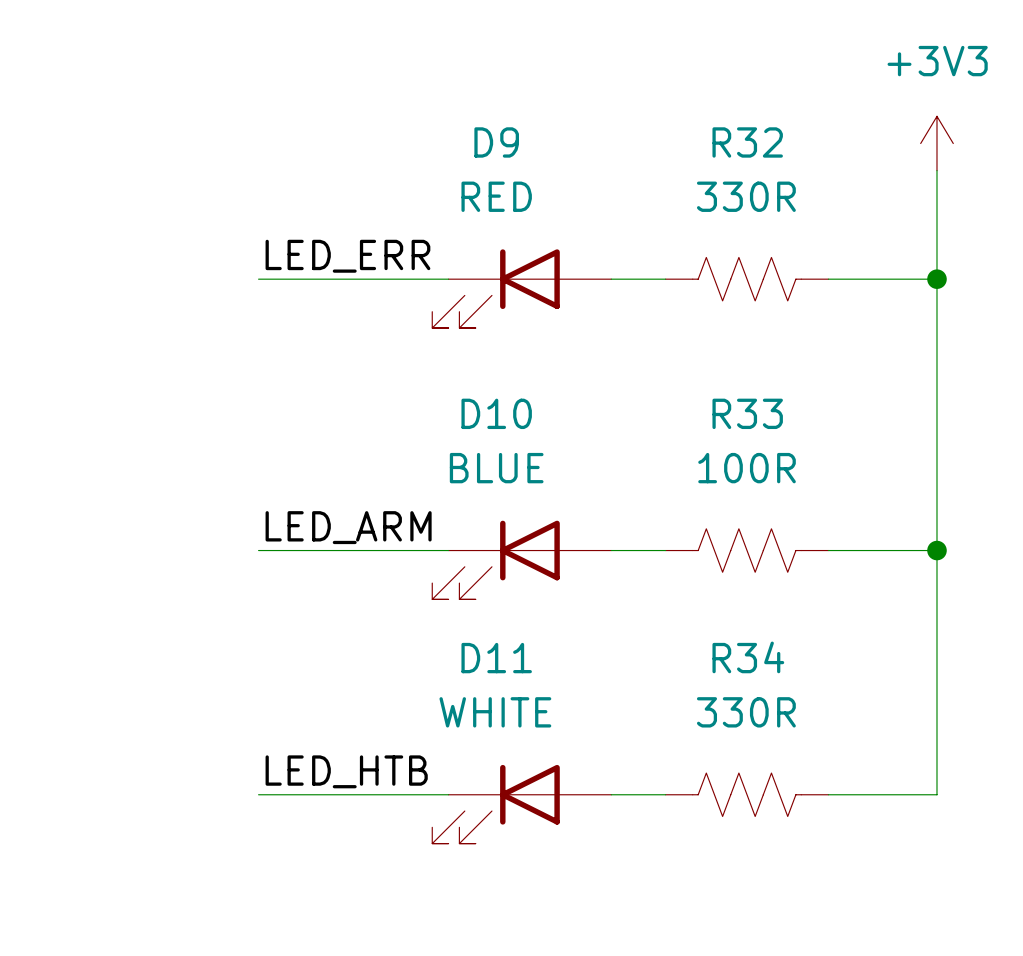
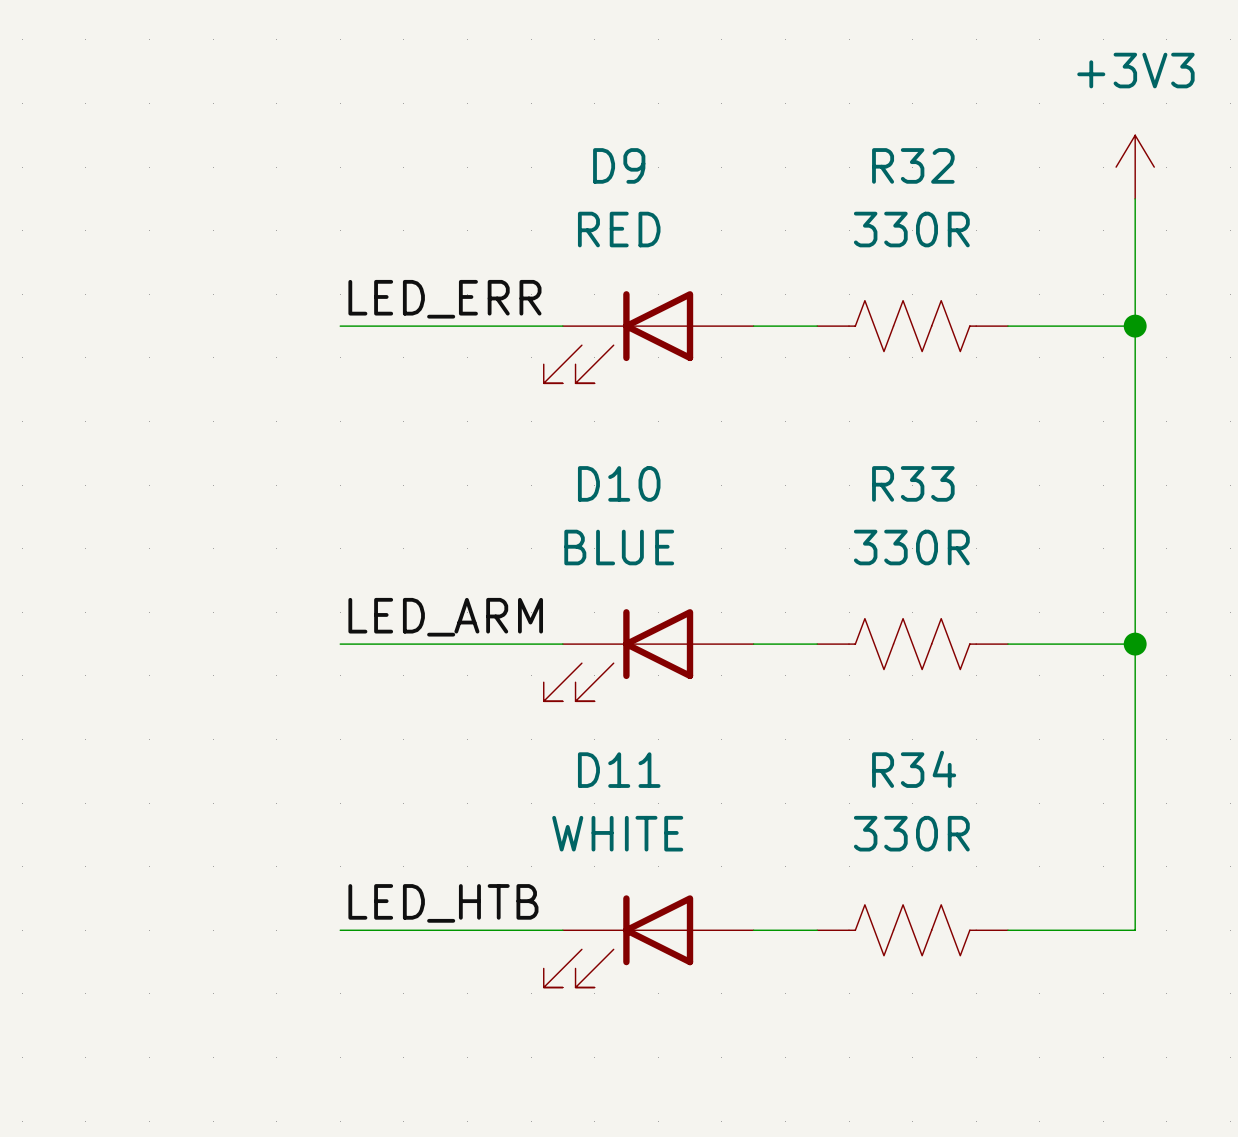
R33 value: 100R (747, 468) -> 330R (911, 547)

